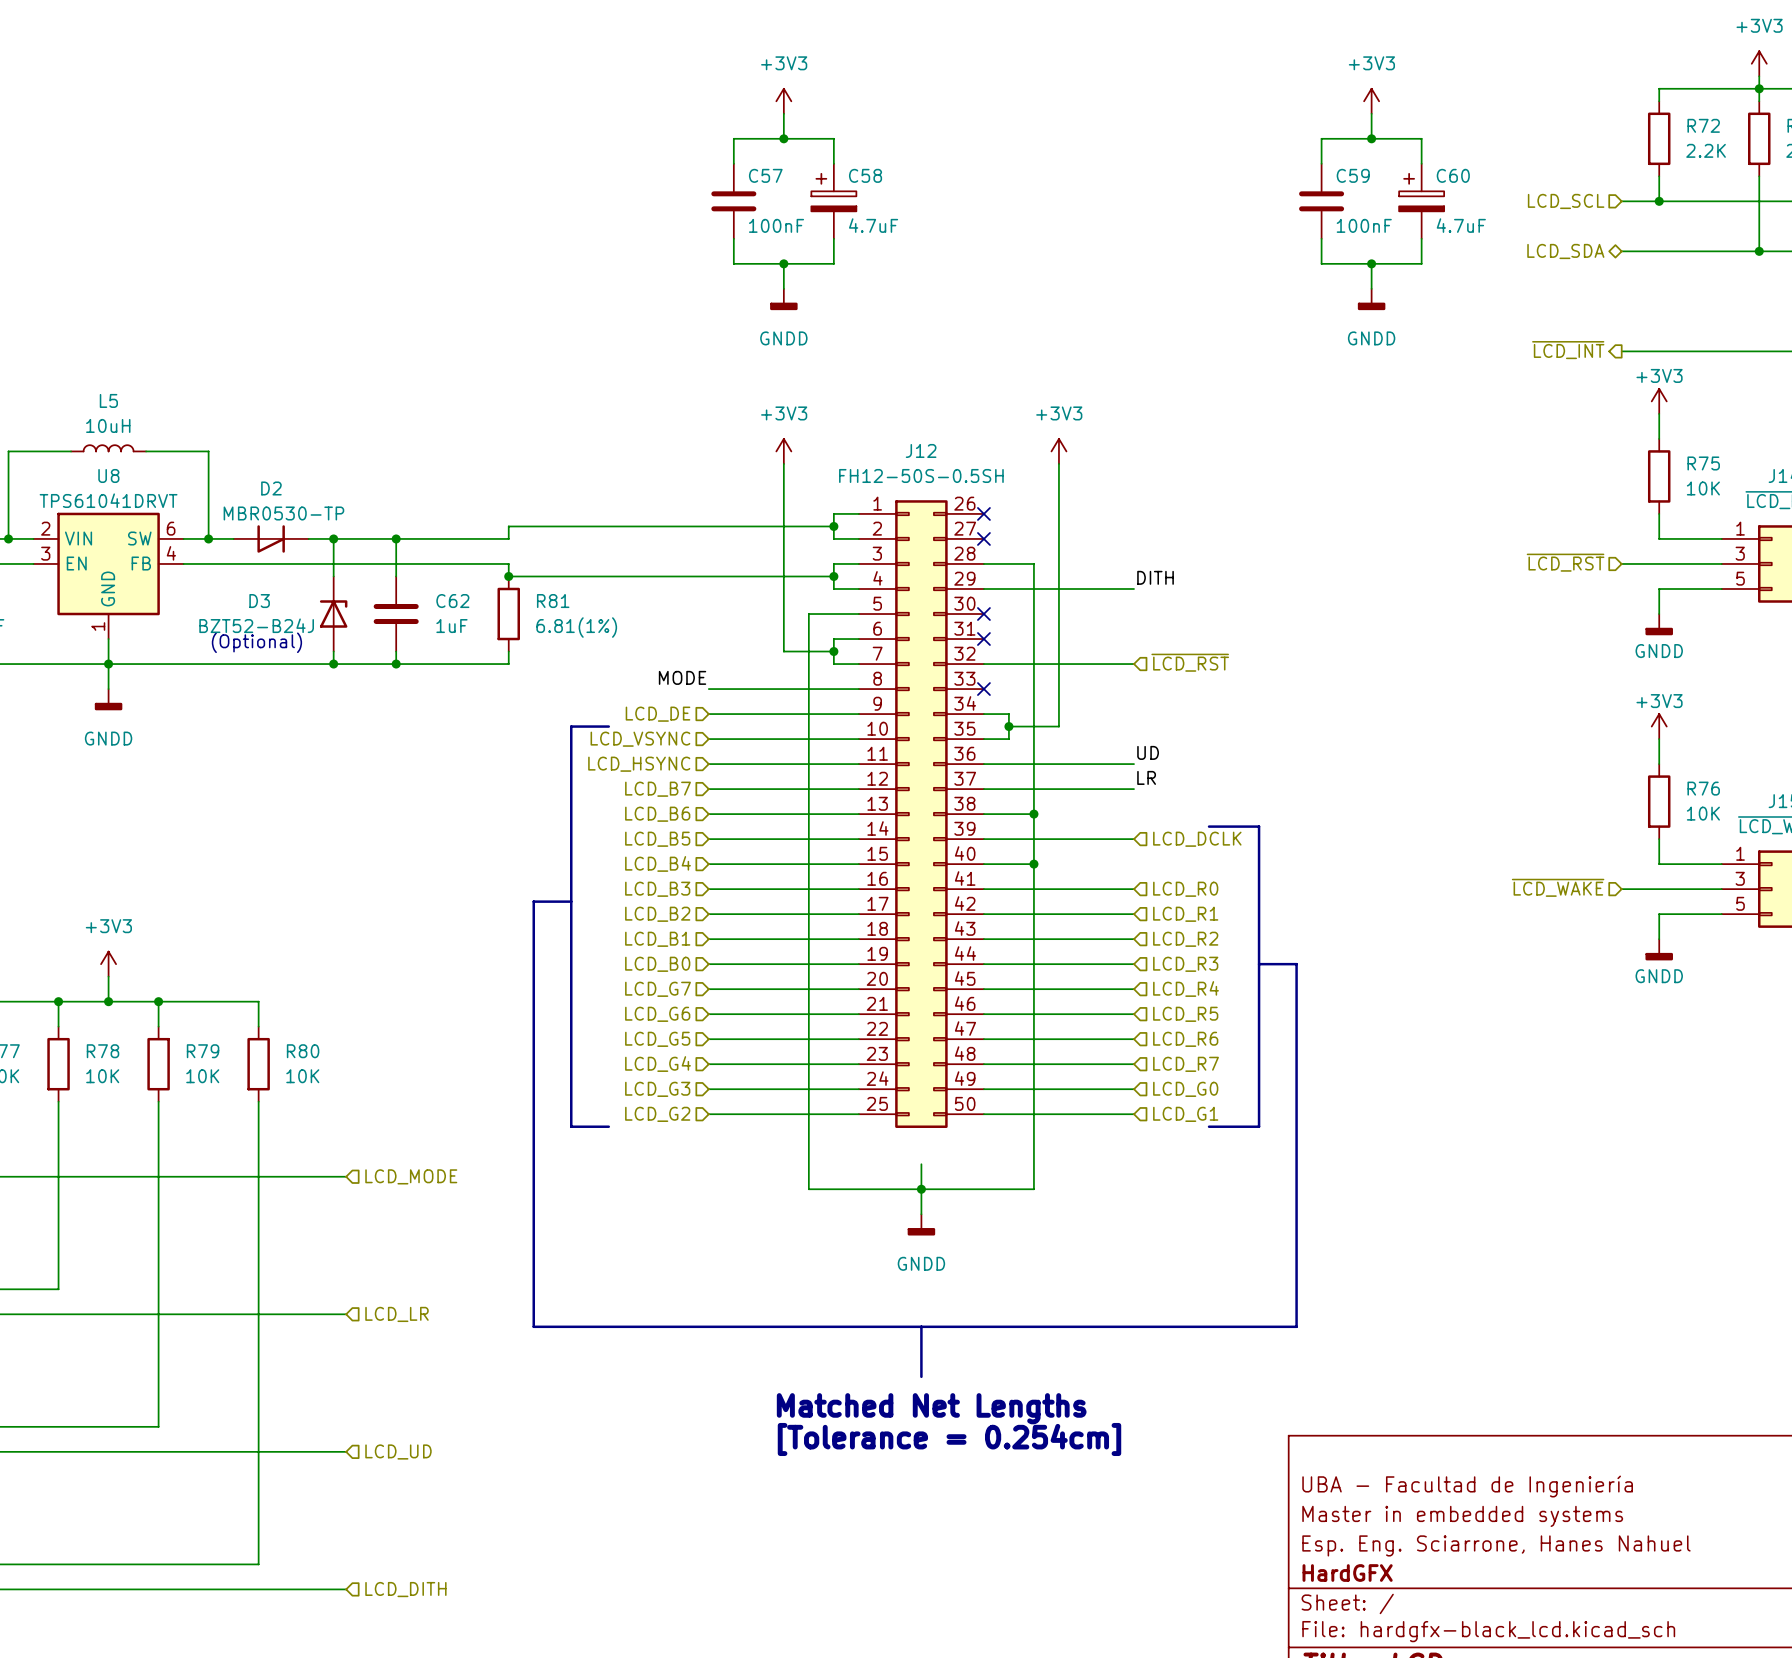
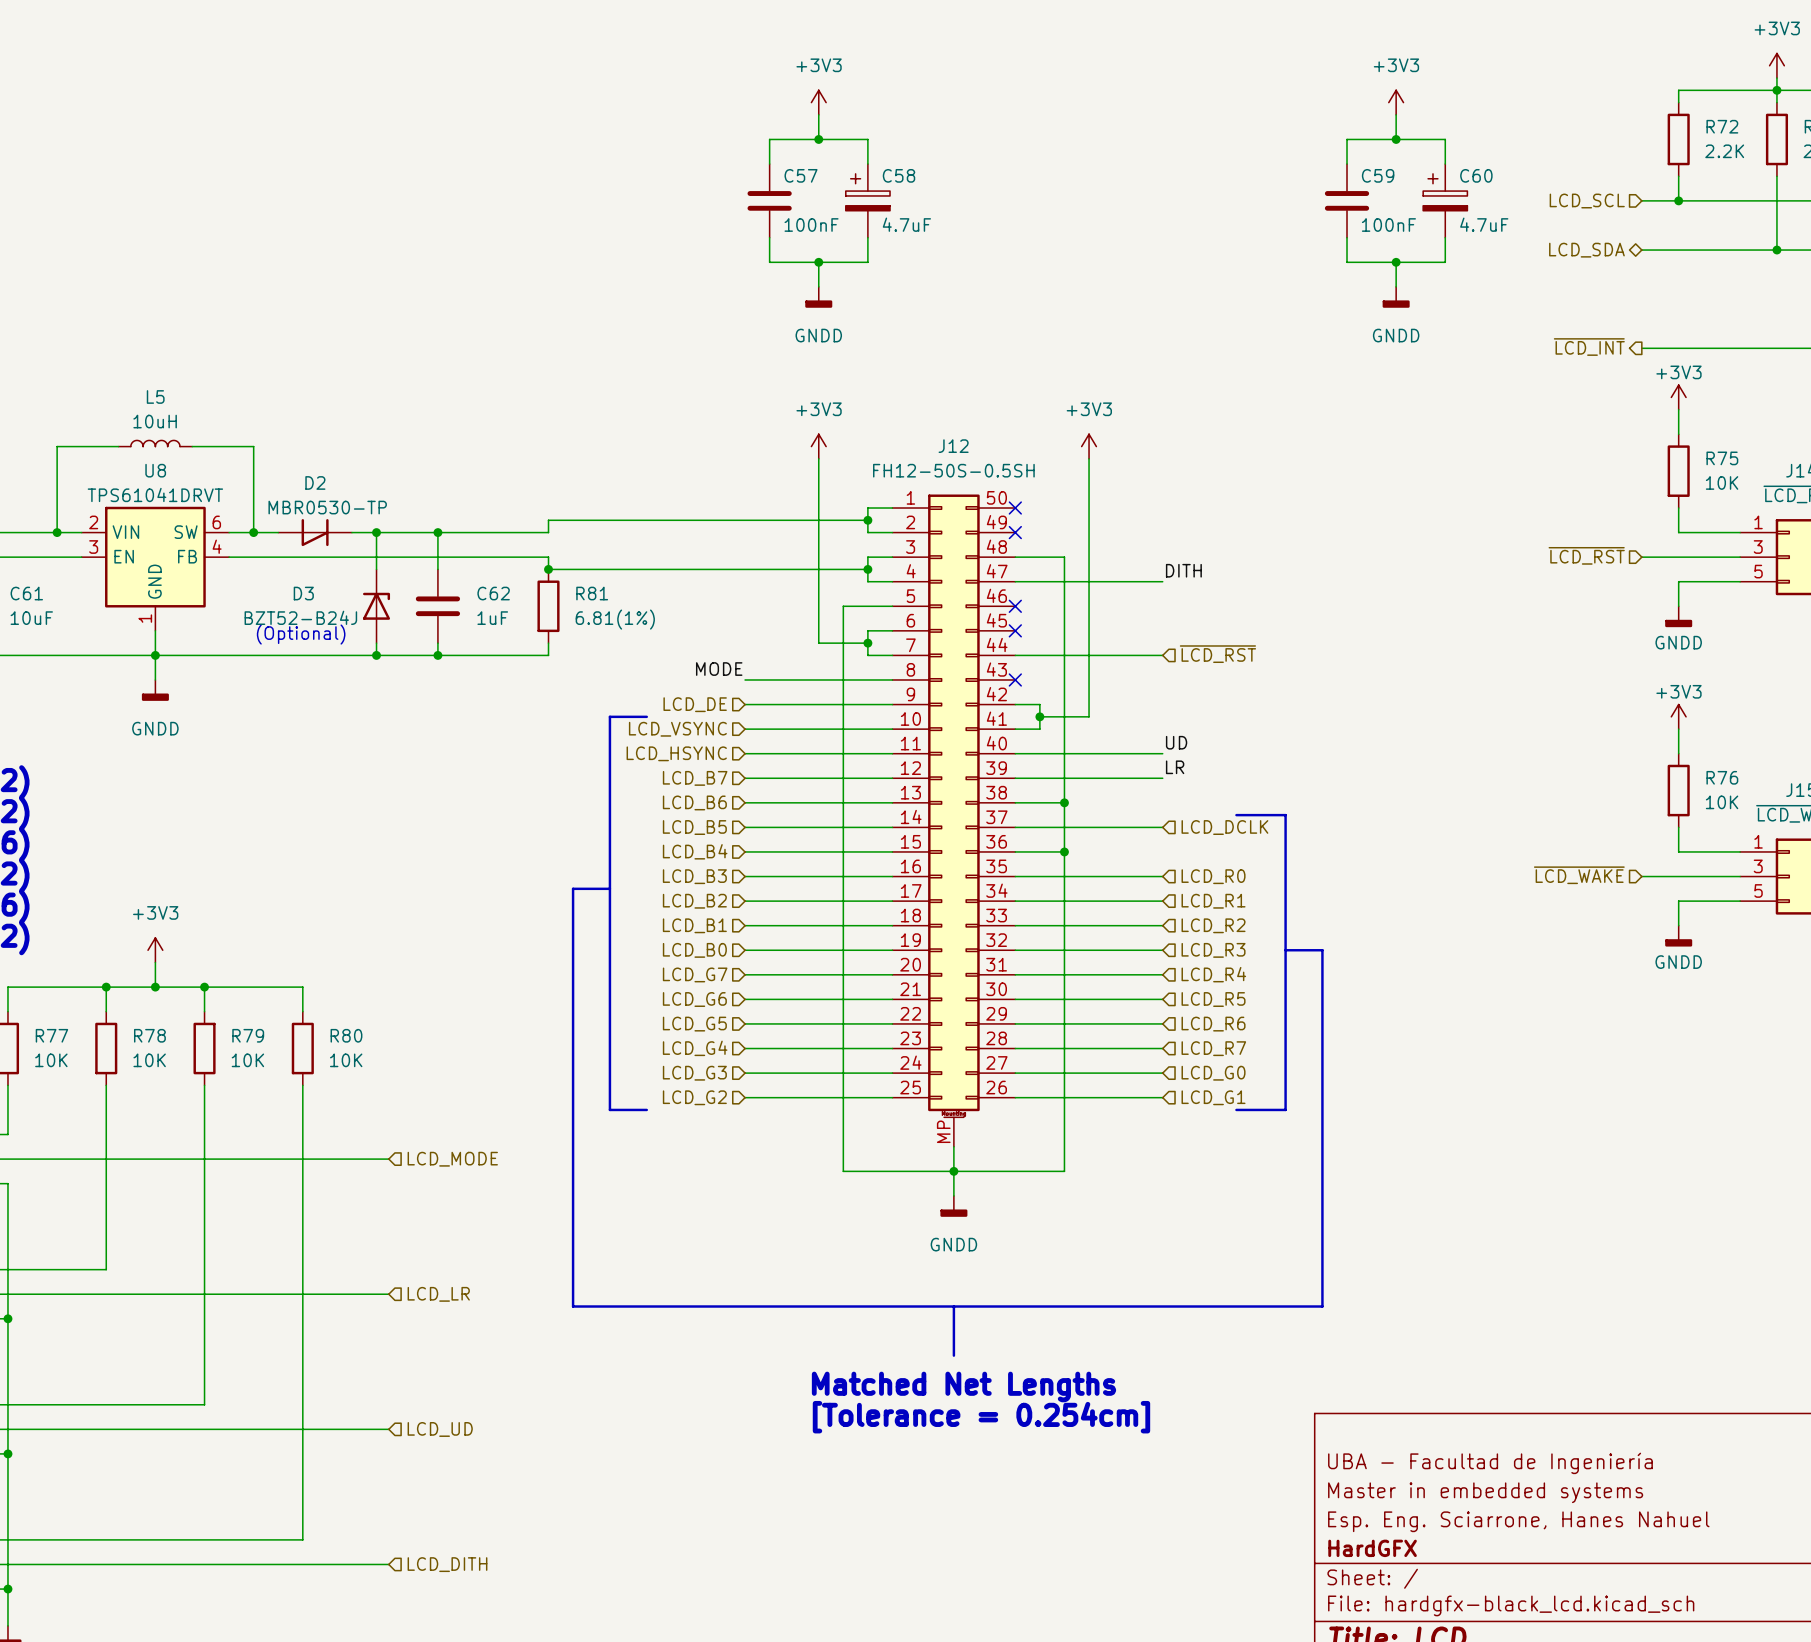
J12 symbol: [858, 500, 984, 1128] -> [892, 494, 1016, 1147]

